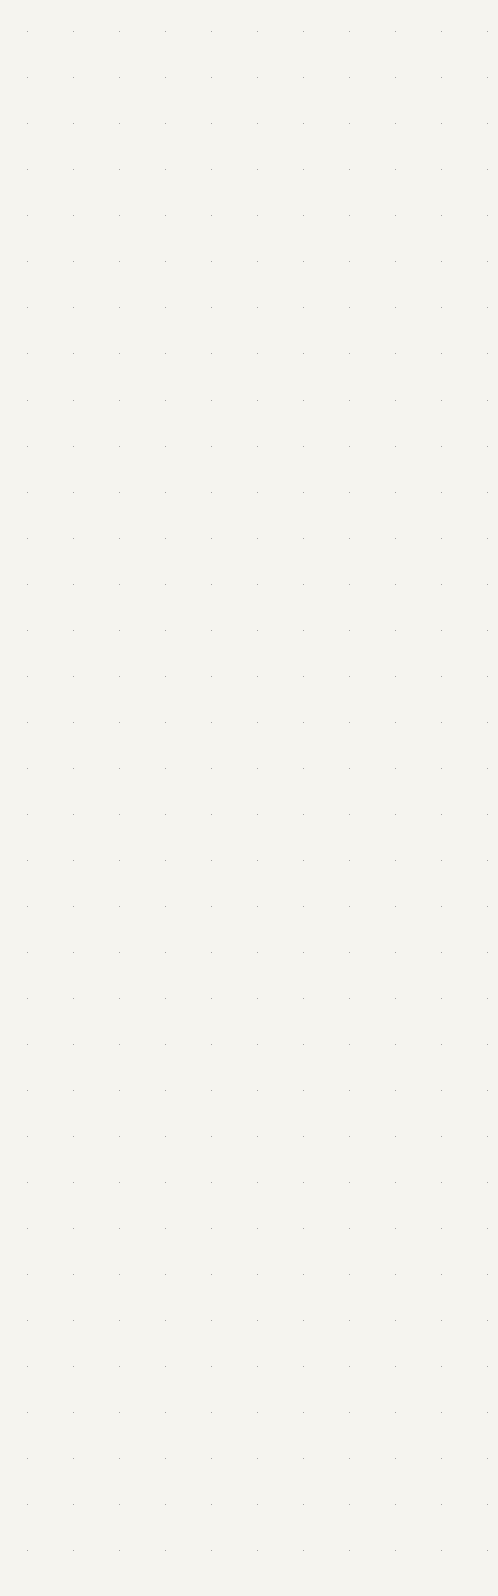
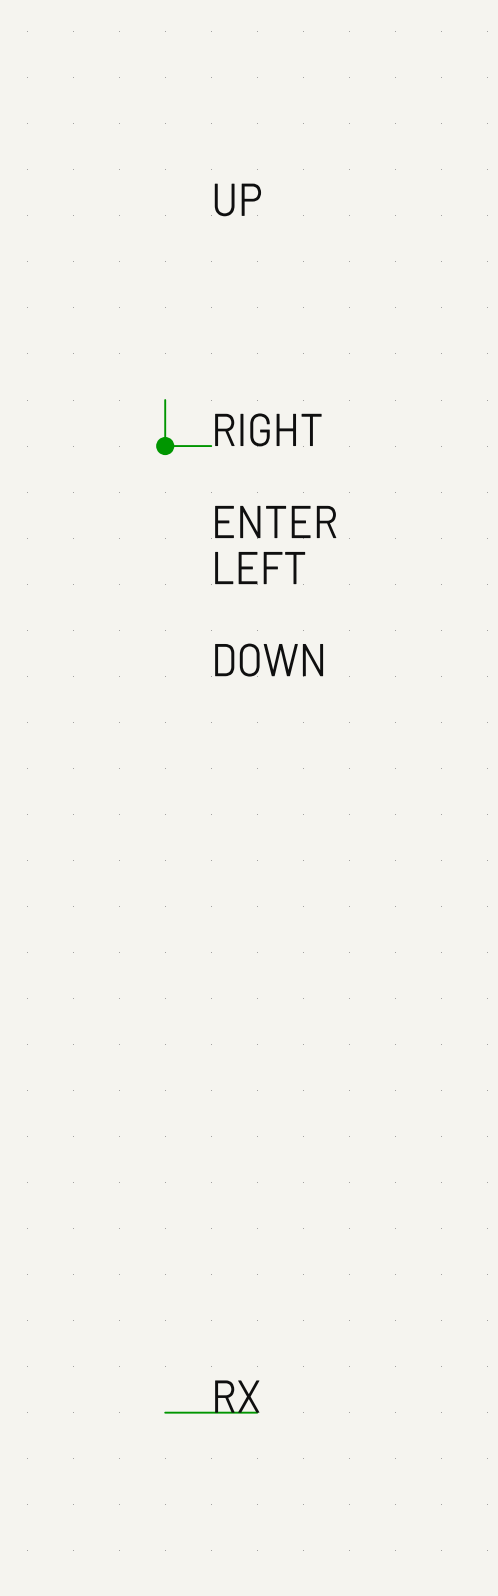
label: none -> UP (237, 199)
wire: none -> (165, 400) (165, 446) (211, 446)
label: none -> RIGHT (268, 429)
junction: none -> (165, 446)
label: none -> ENTER (275, 521)
label: none -> LEFT (260, 568)
label: none -> DOWN (269, 660)
label: none -> RX (237, 1396)
wire: none -> (165, 1412) (257, 1412)

